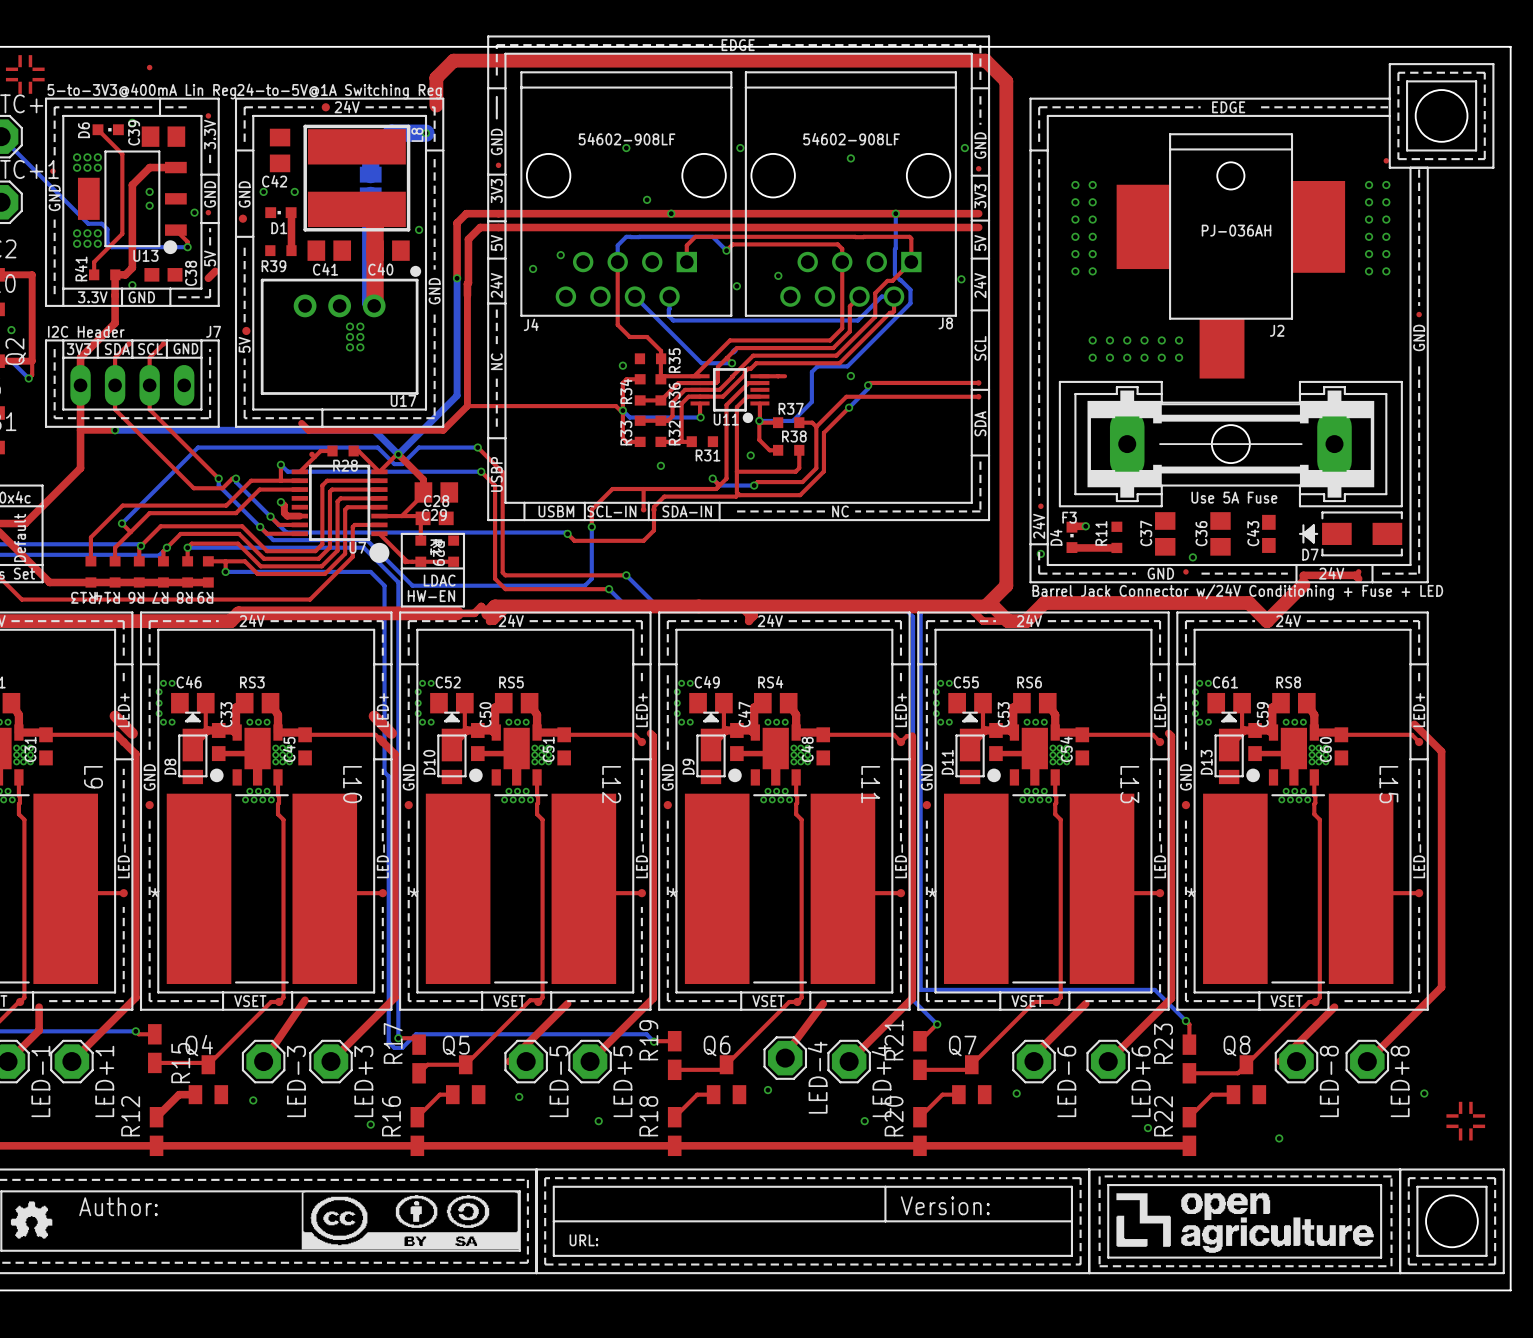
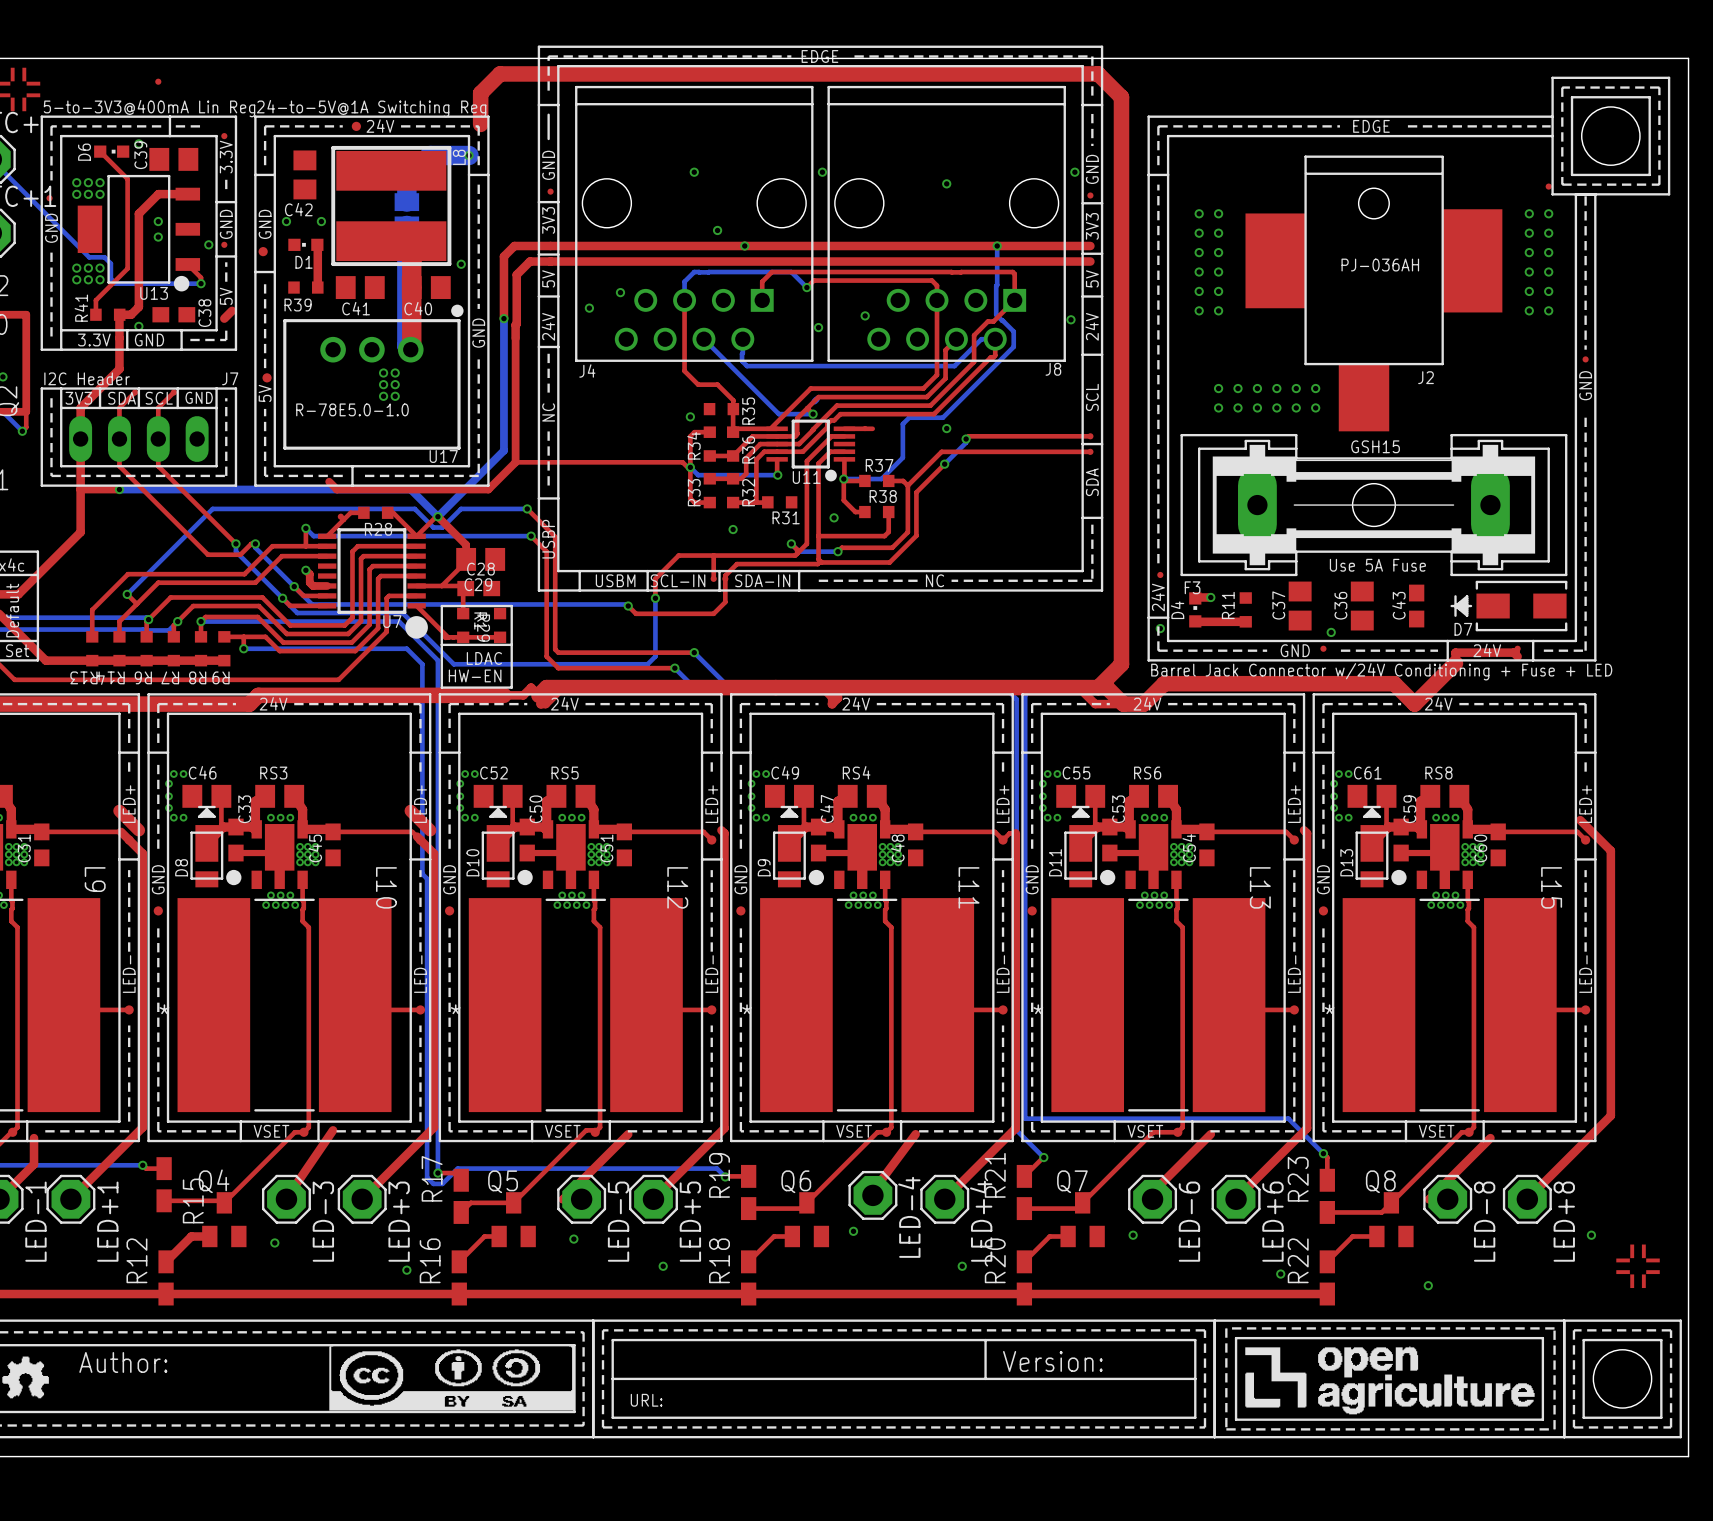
J4 value: 54602-908LF (627, 139) -> none
J8 value: 54602-908LF (851, 139) -> none
U17 value: none -> R-78E5.0-1.0 (352, 409)
F3 value: none -> GSH15 (1375, 446)

